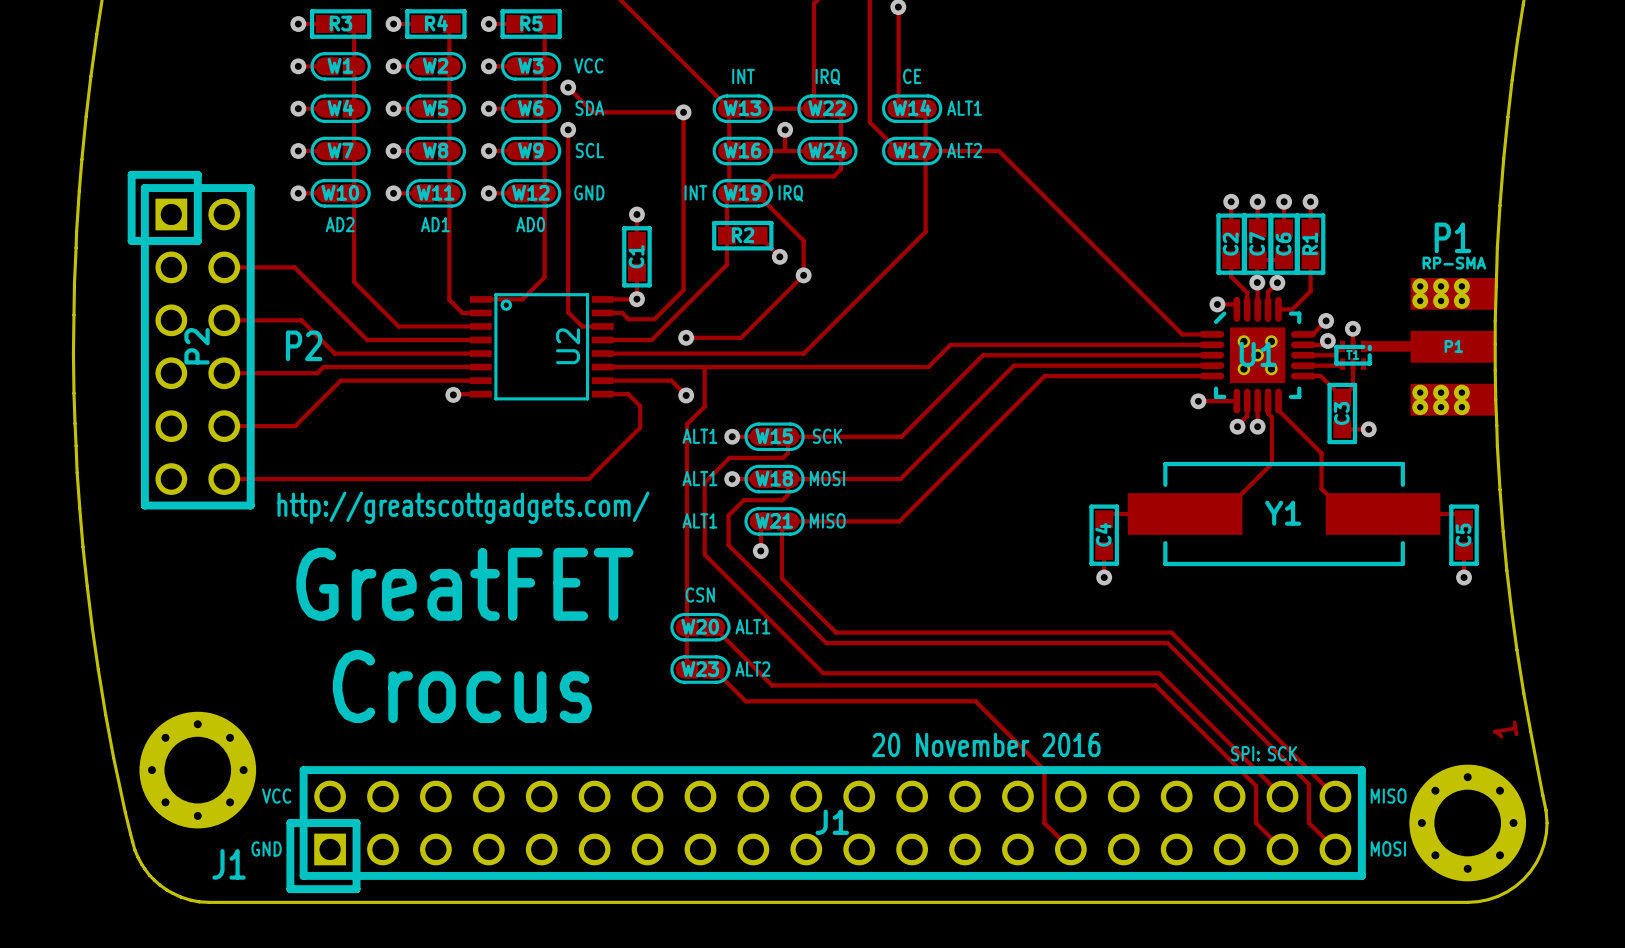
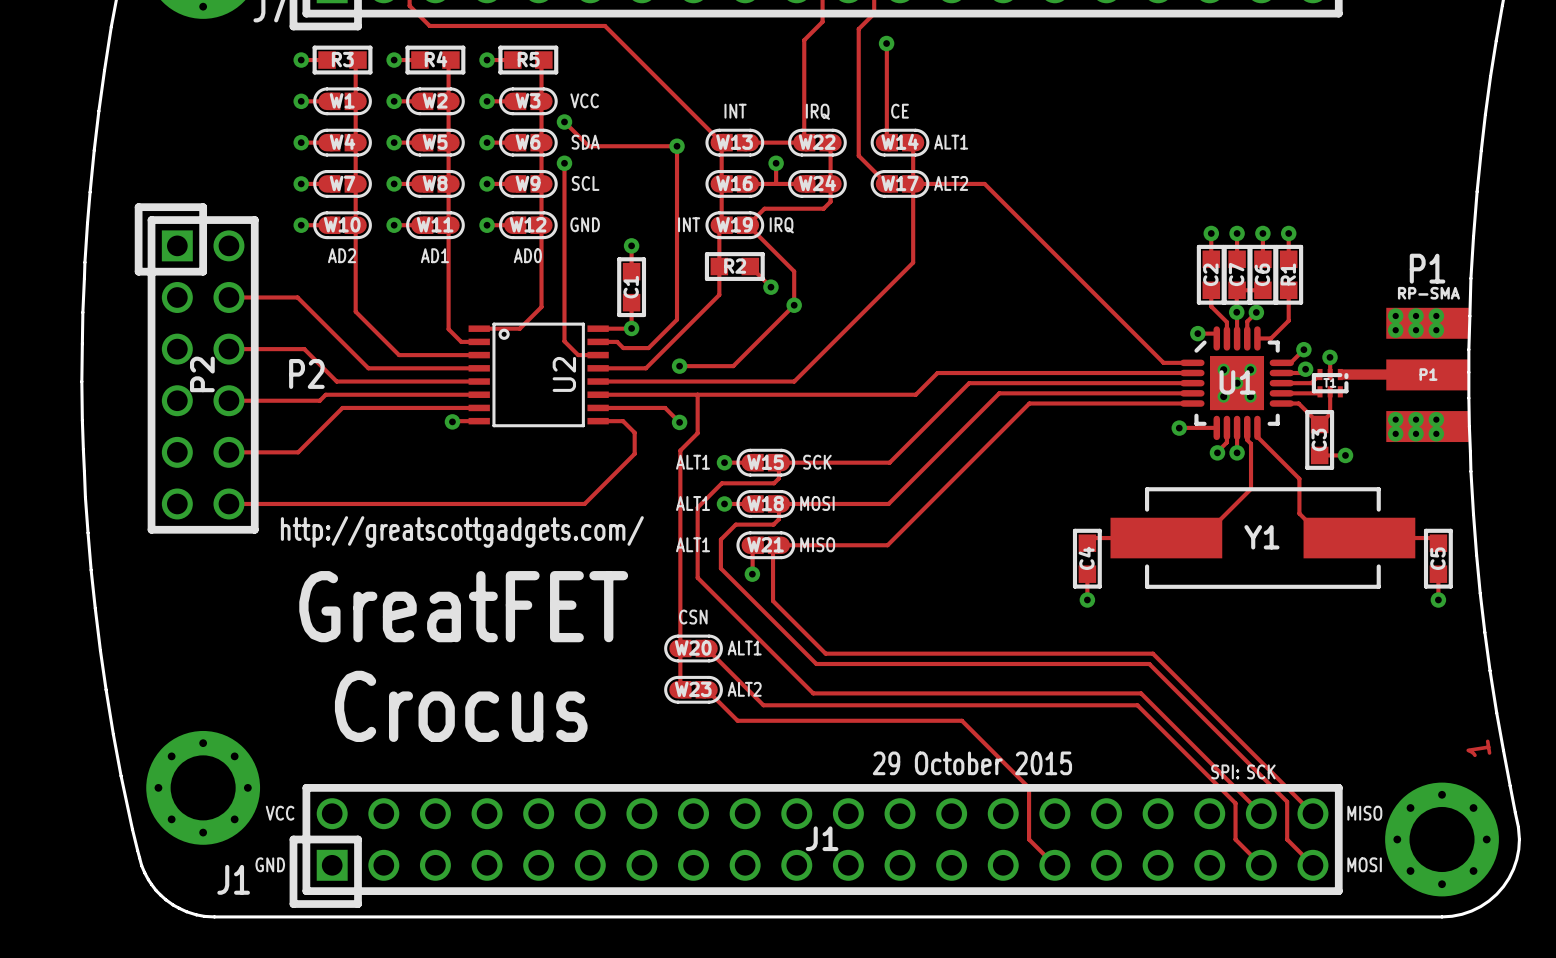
text: 20 November 2016 (986, 744) -> 29 October 2015 (972, 763)

